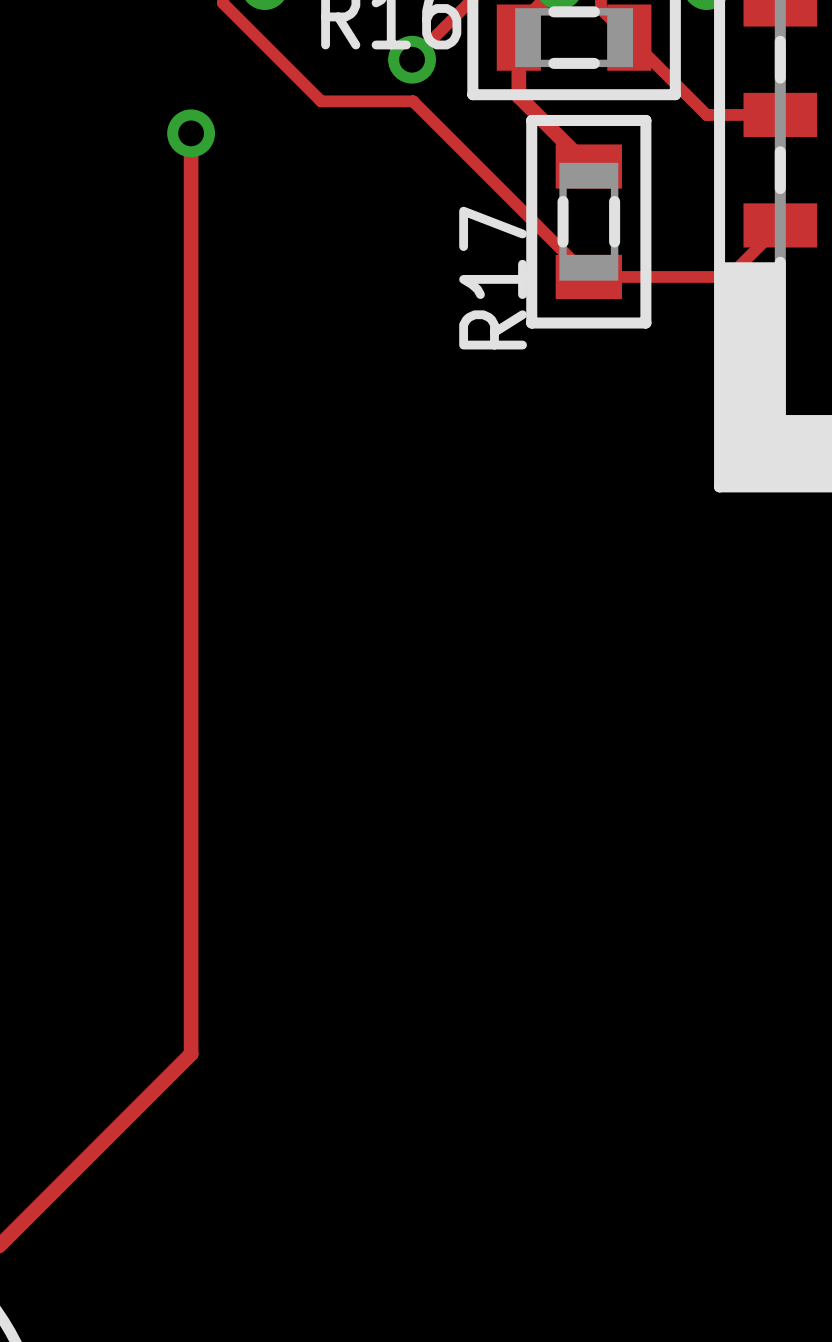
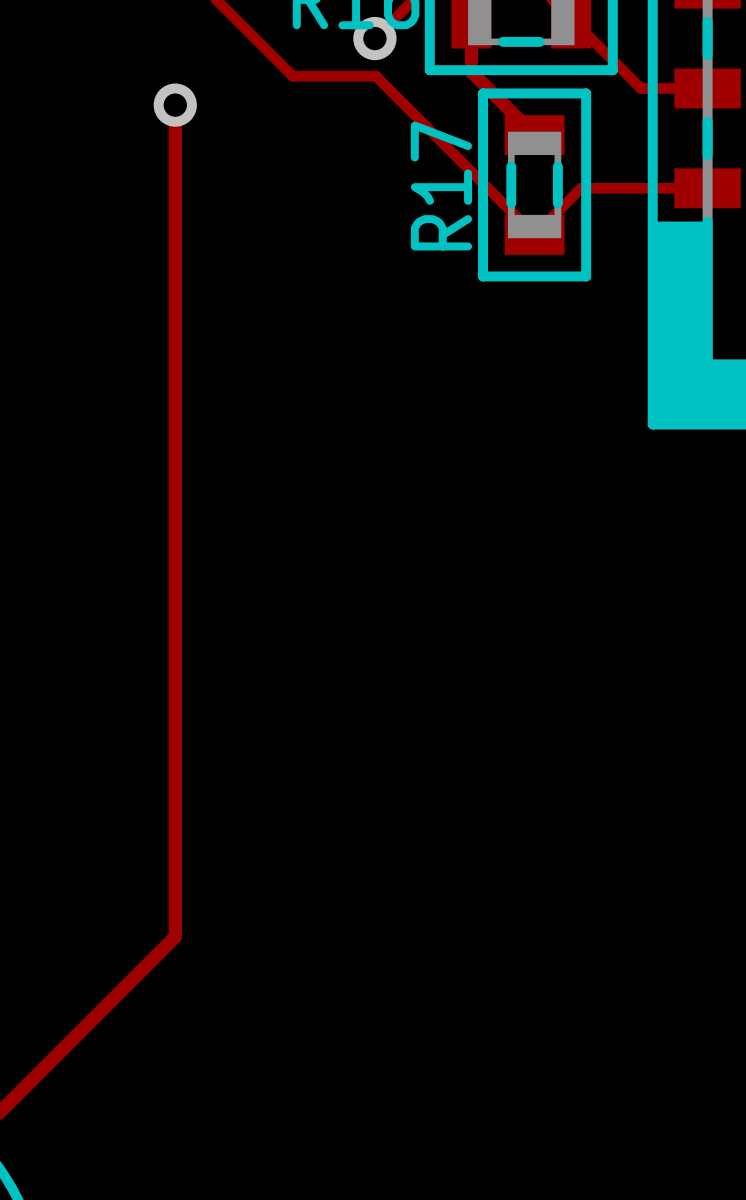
track: (780, 225) (728, 276) (588, 276) -> (707, 188) (581, 188) (534, 234)
R17 name position: R17 (493, 278) -> R17 (441, 186)

